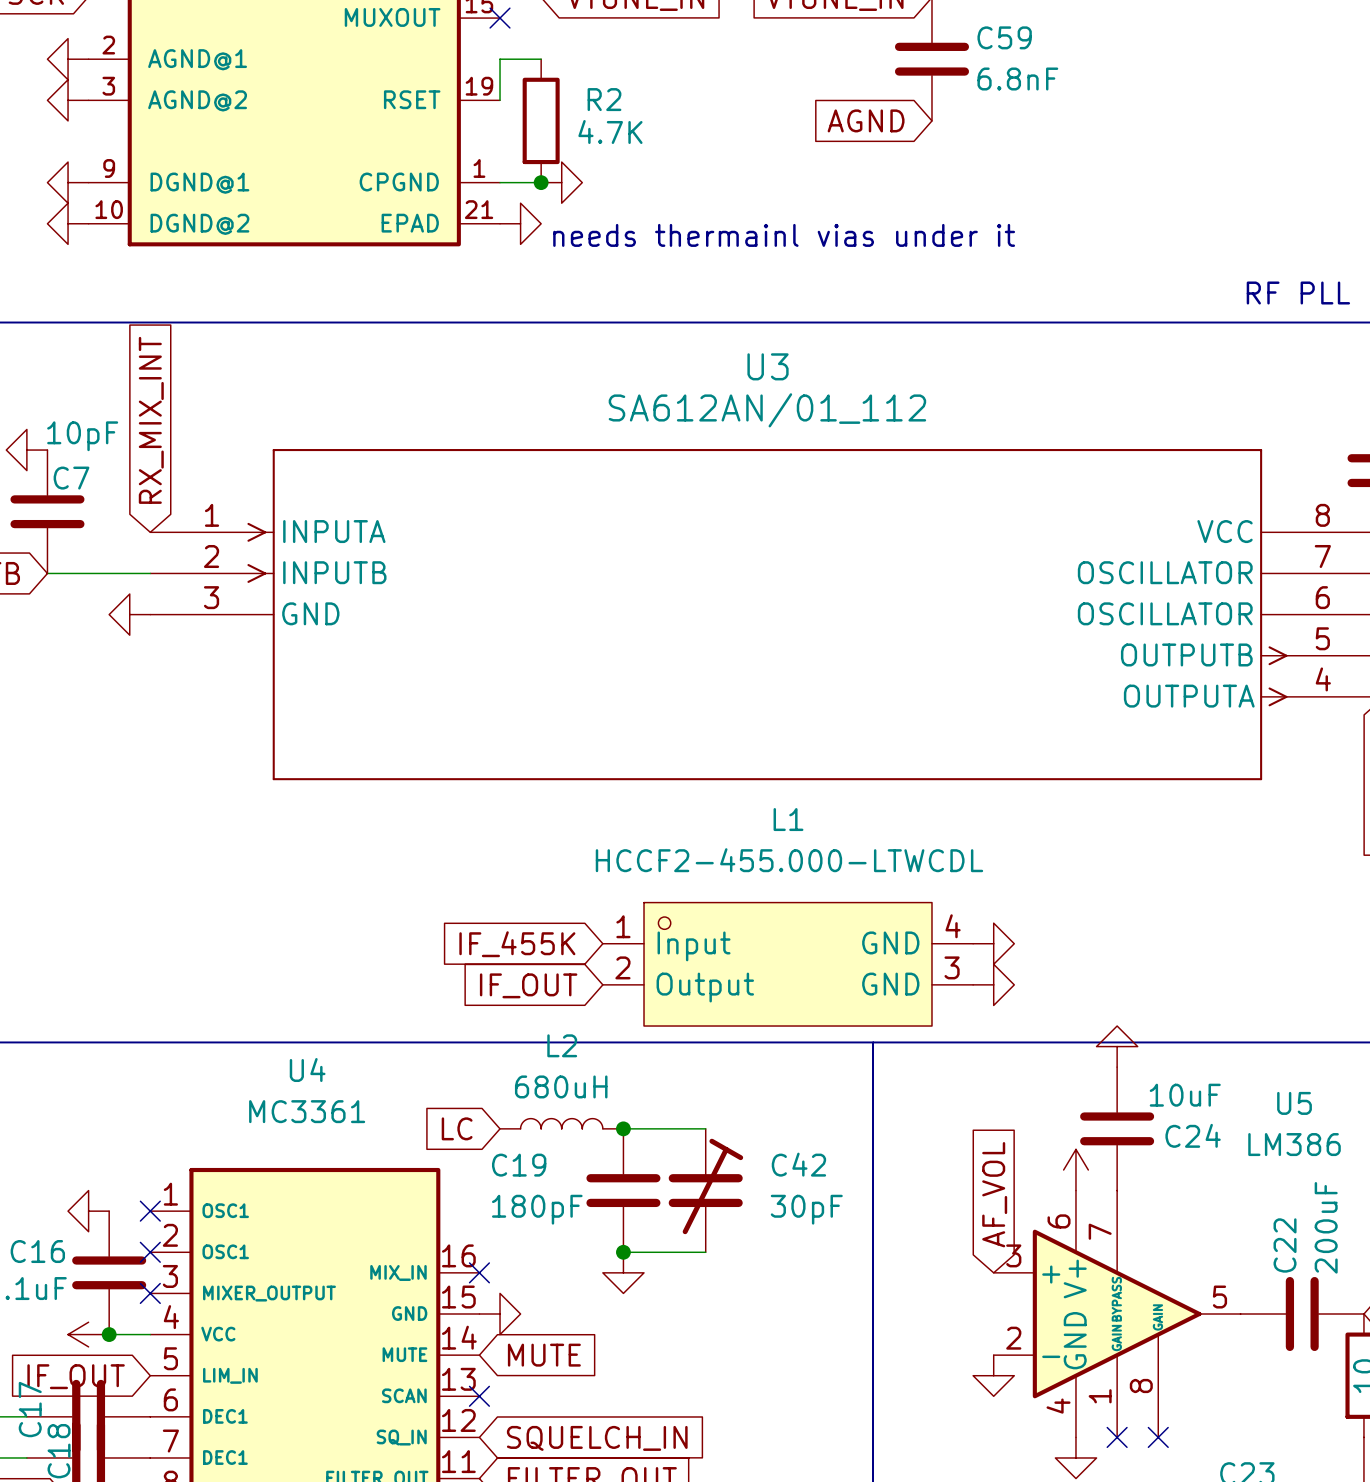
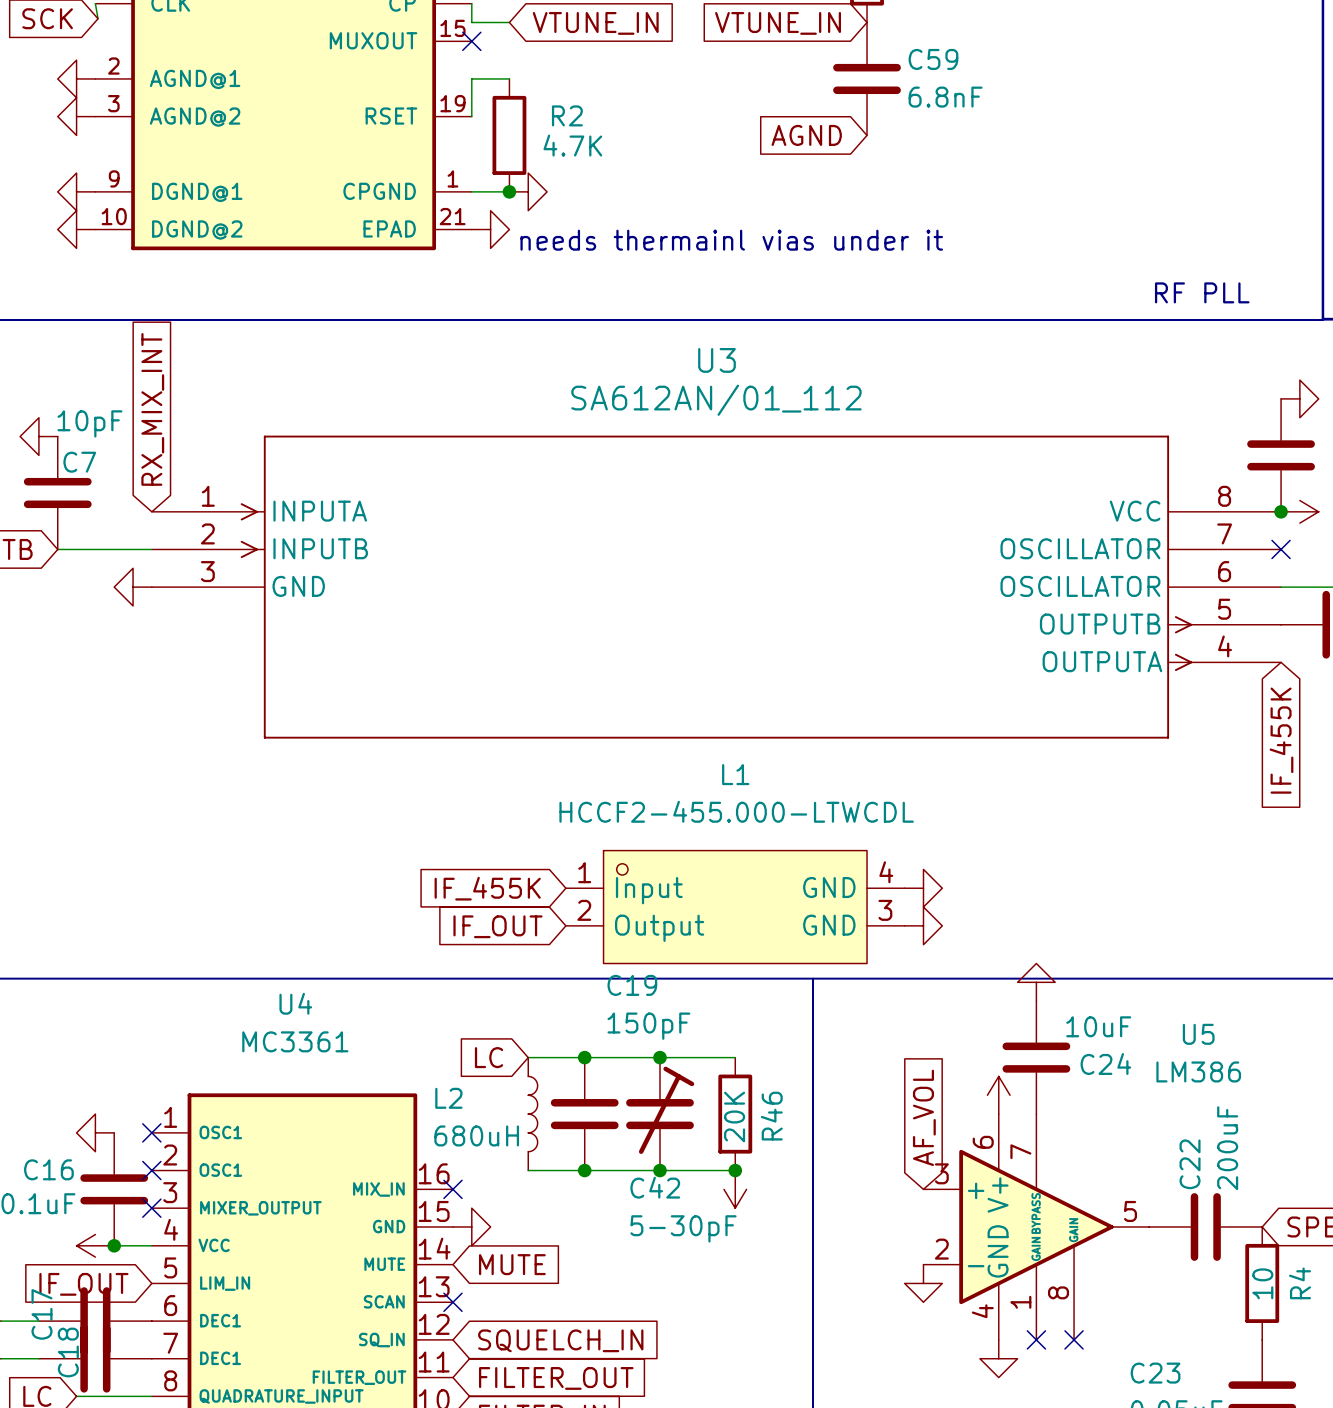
L2 name position: L2 (562, 1045) -> L2 (448, 1098)
L2 value position: 680uH (561, 1086) -> 680uH (476, 1135)
L2 rotation: 0° (561, 1123) -> 90° clockwise (532, 1114)
global label position: LC (457, 1128) -> LC (489, 1057)
wire: none -> (528, 1057) (584, 1057)
wire: none -> (659, 1057) (735, 1057)
junction: none -> (659, 1057)
C42 name position: C42 (798, 1164) -> C42 (655, 1187)
C19 name position: C19 (519, 1165) -> C19 (632, 985)
R46: none -> 20K (735, 1114)
C19 value: 180pF (537, 1209) -> 150pF (648, 1026)
C42 value: 30pF (806, 1209) -> 5-30pF (683, 1228)
wire: none -> (528, 1170) (584, 1170)
wire: none -> (659, 1170) (735, 1170)
junction: none -> (659, 1170)
junction: none -> (735, 1170)
power symbol: (623, 1272) -> none
power symbol: none -> (735, 1189)

